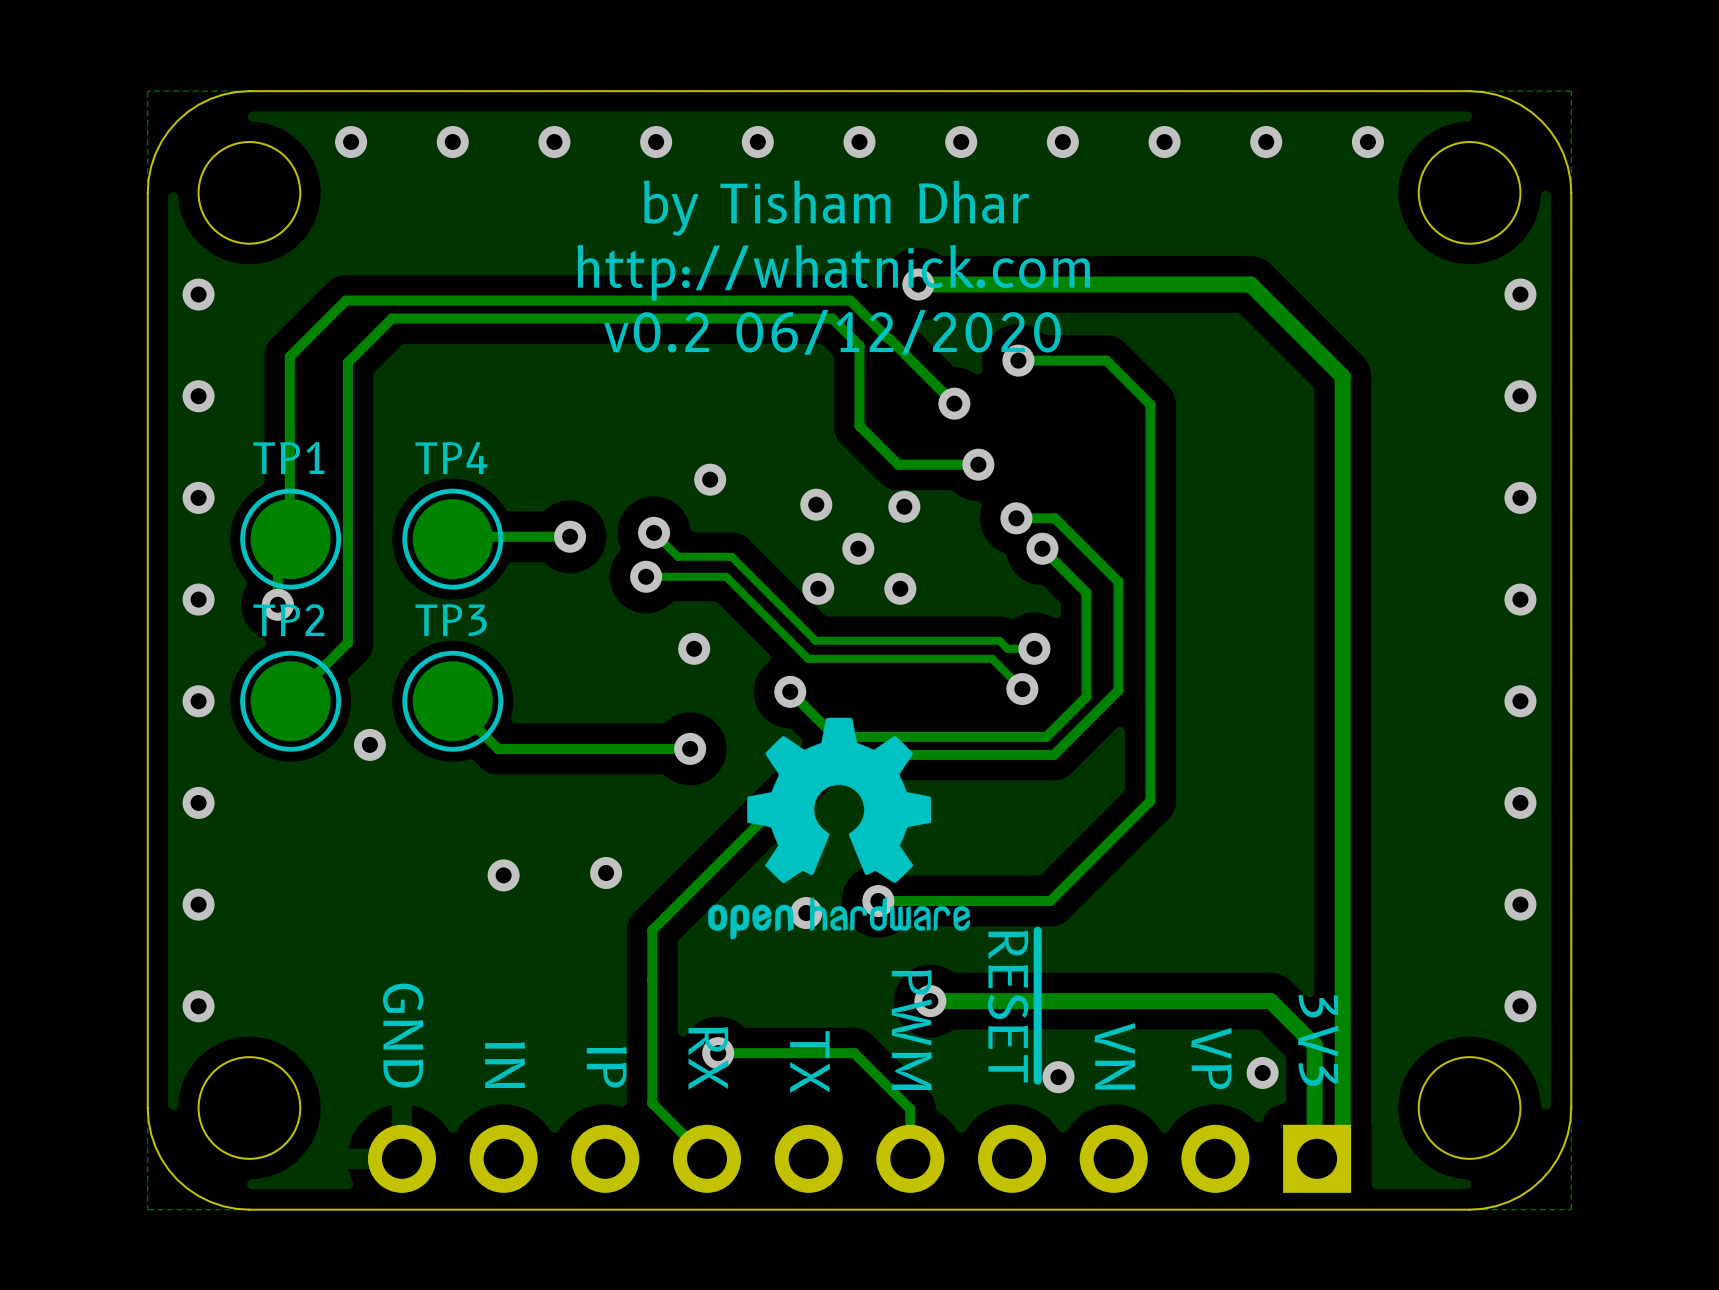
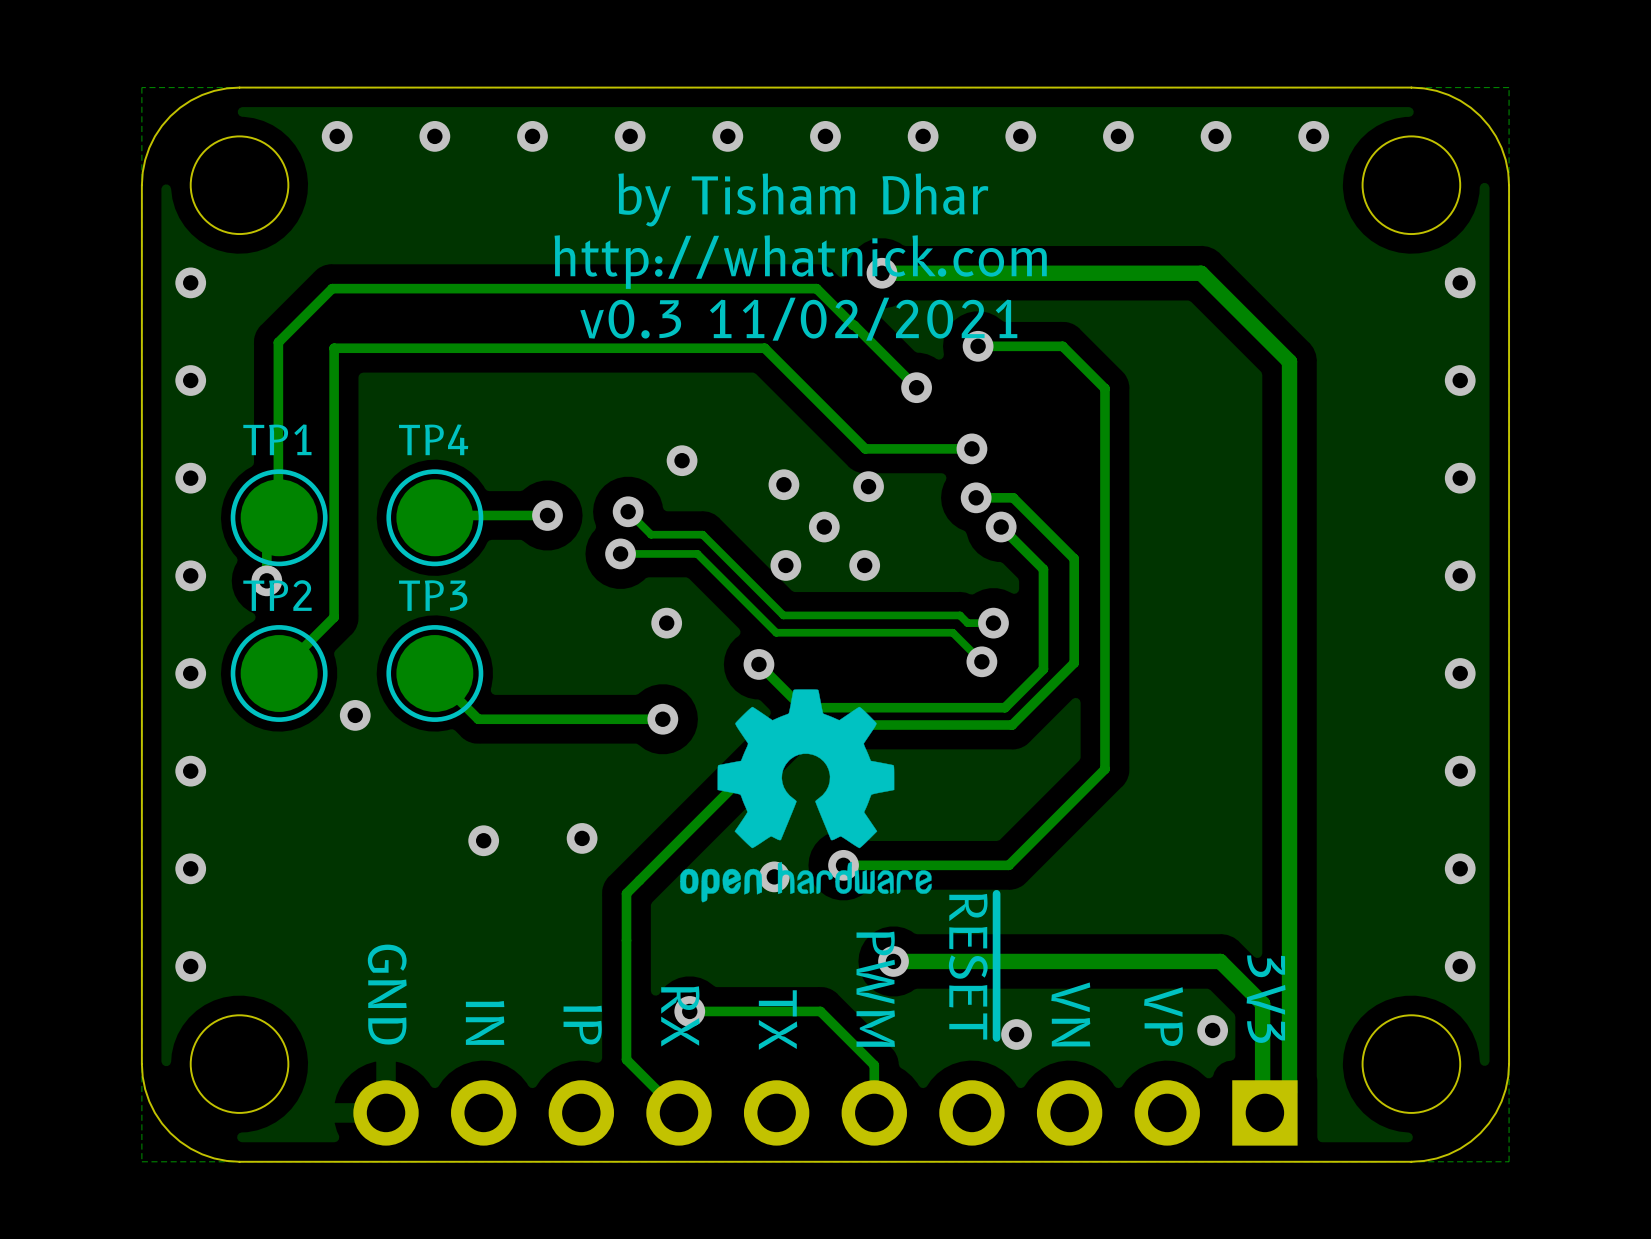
text: v0.2 06/12/2020 (832, 332) -> v0.3 11/02/2021 (798, 319)
track: (347, 362) (391, 318) (832, 318) (859, 345) (859, 425) -> (334, 348) (764, 348) (825, 408)
track: (978, 464) (898, 464) -> (971, 448) (865, 448) (862, 446)
via position: (978, 464) -> (971, 448)

